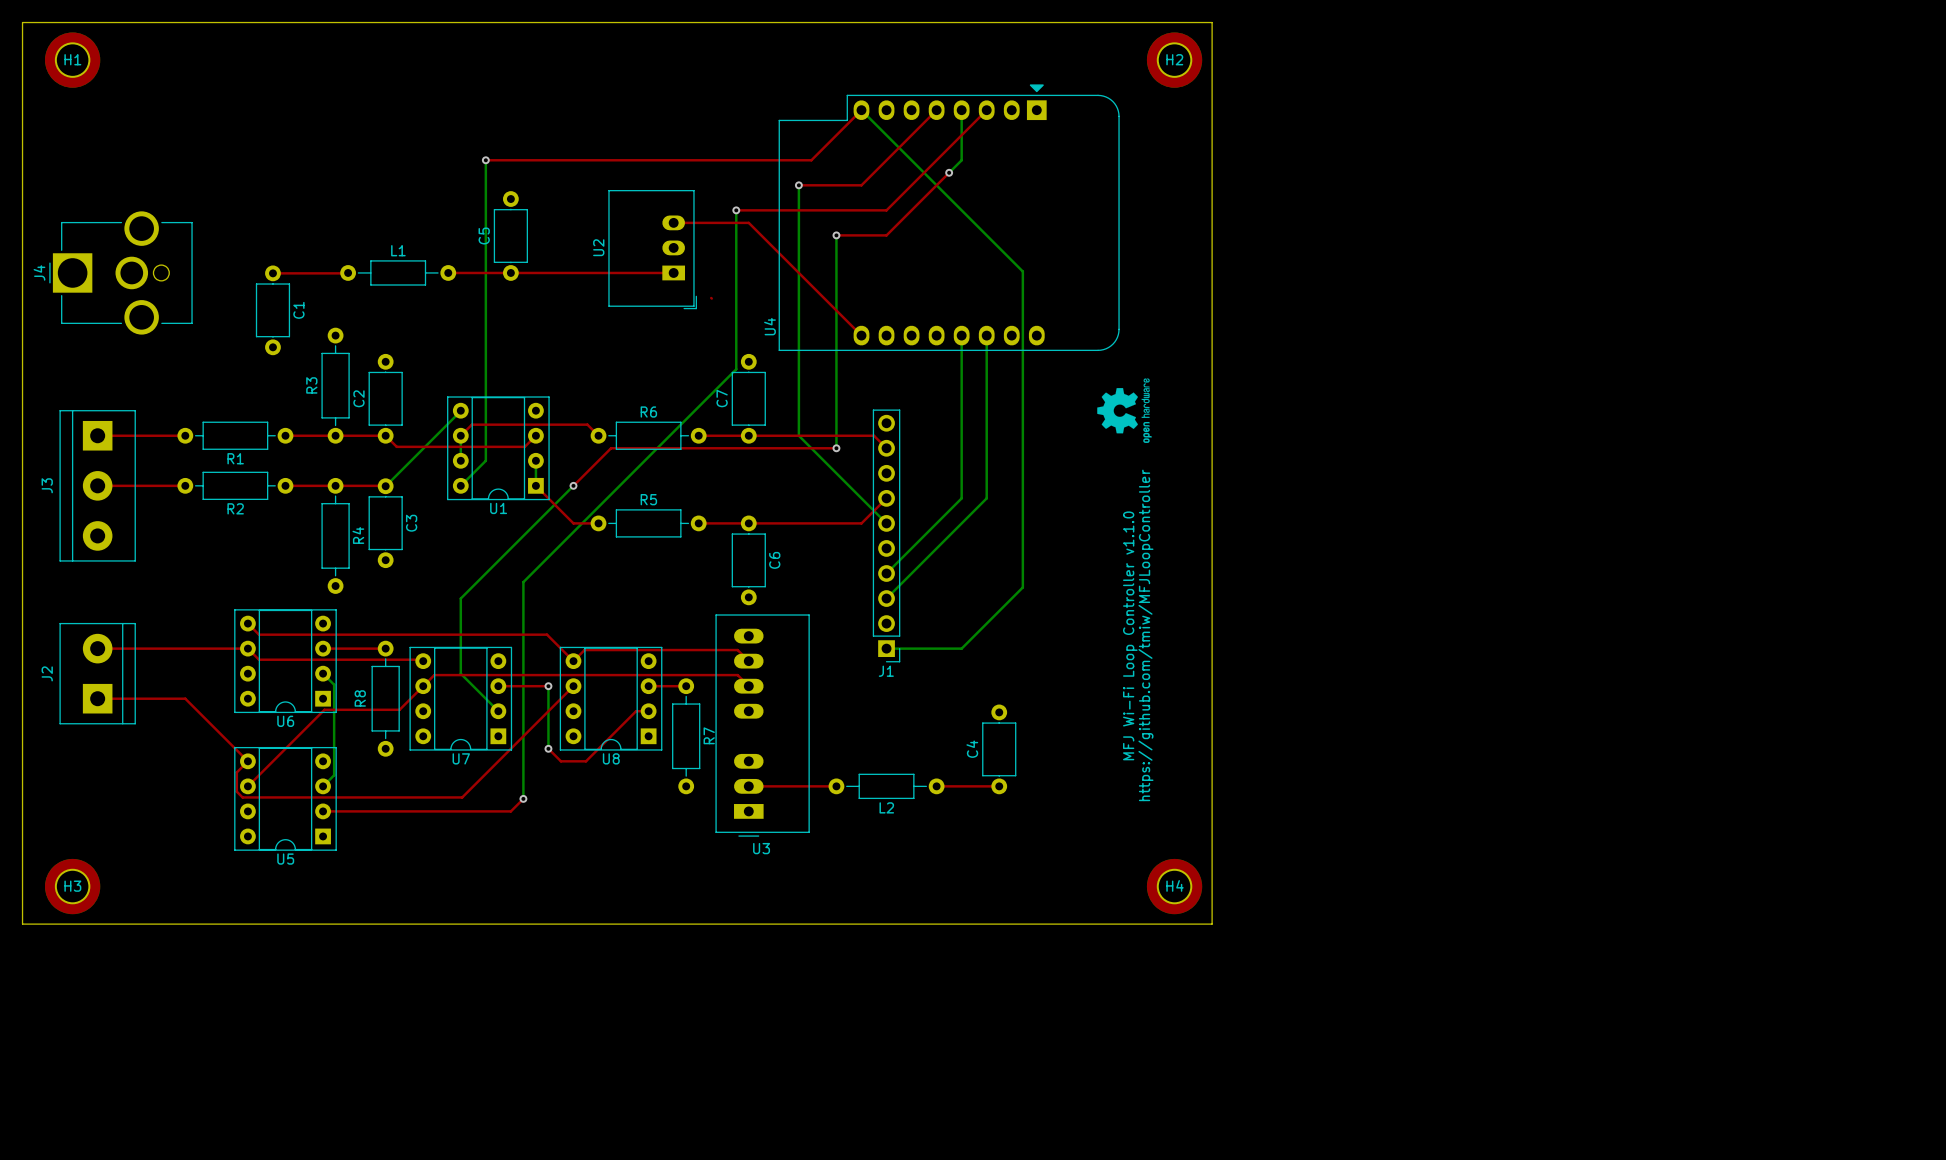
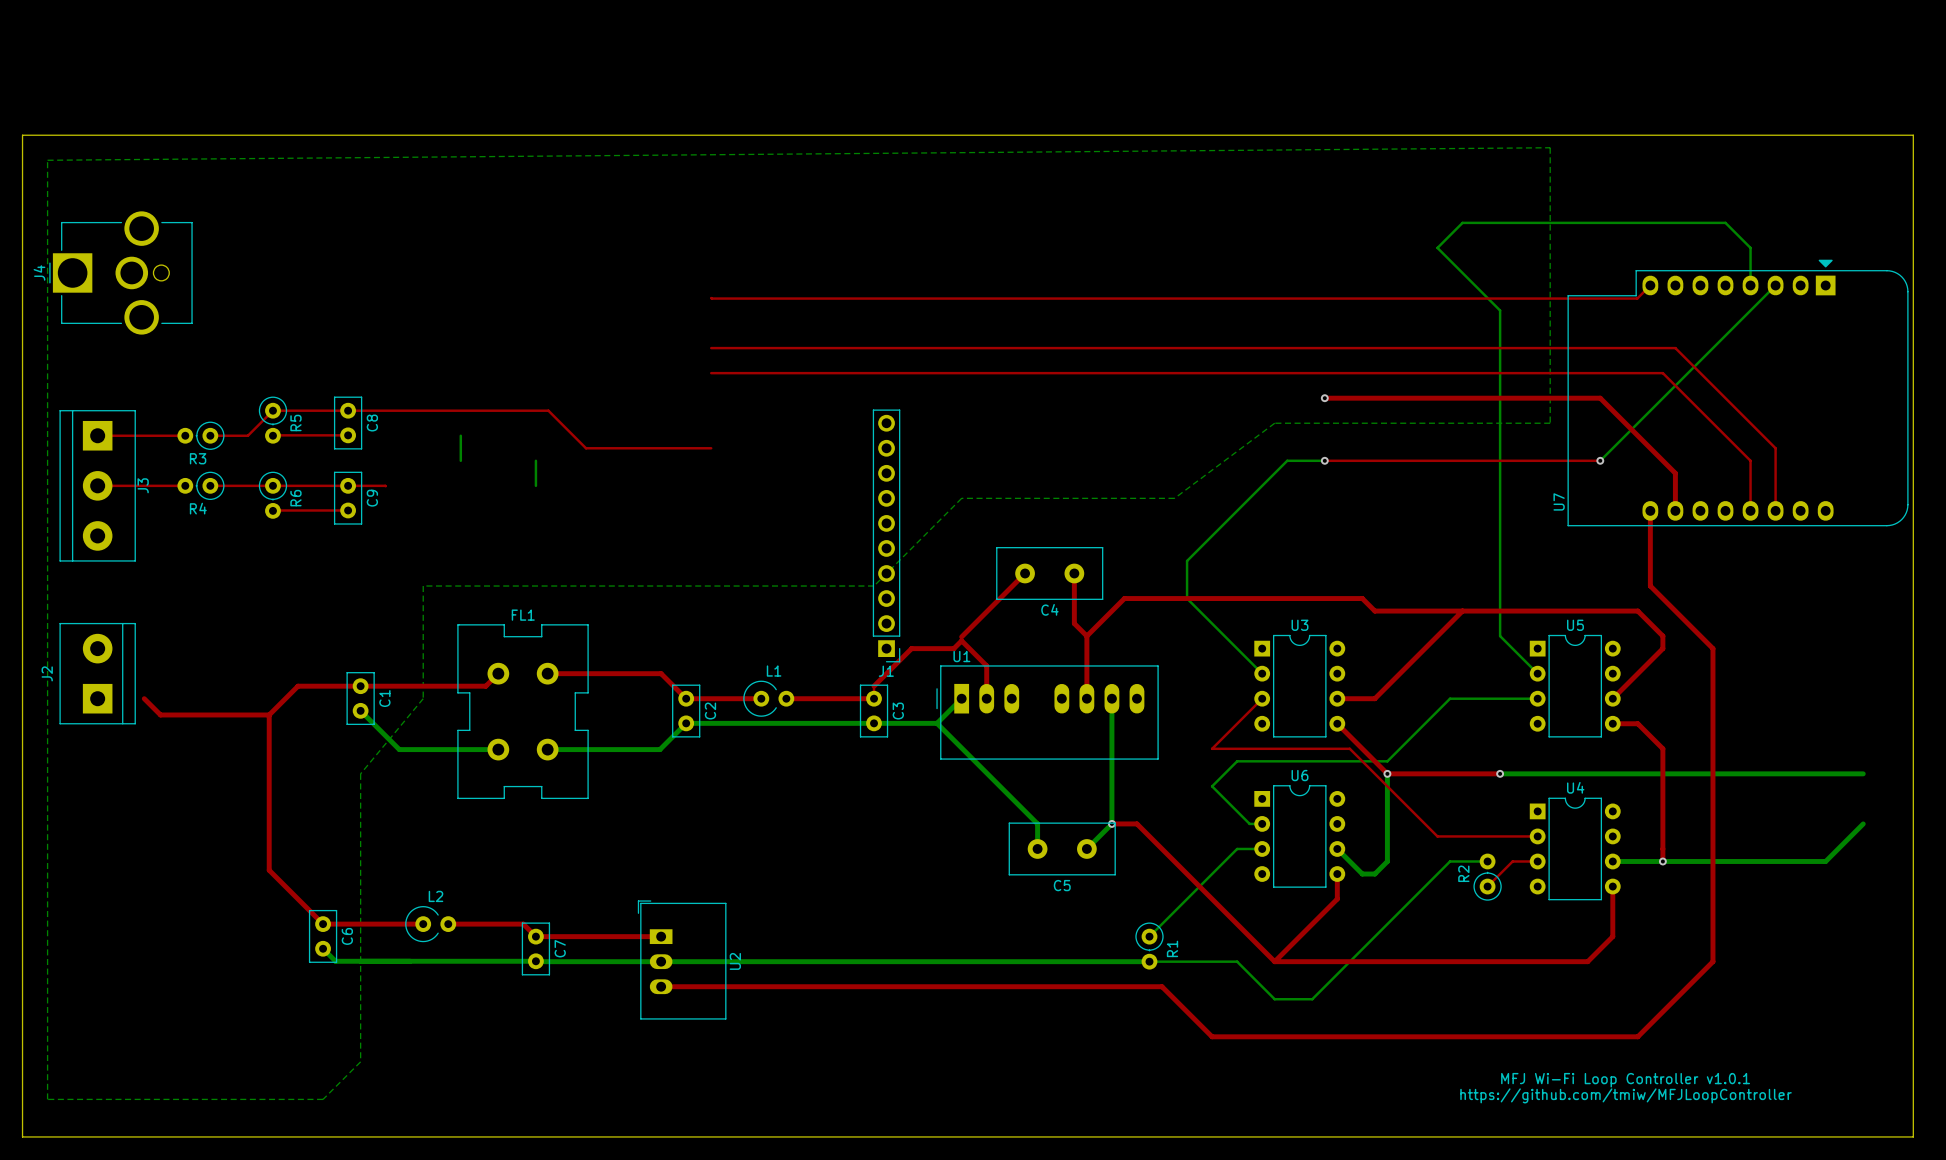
H1: (72, 60) -> none
H2: (1174, 60) -> none
U4 footprint: [778, 84, 1120, 351] -> [1529, 797, 1621, 901]
top track: (861, 110) (811, 160) (485, 160) -> none
bottom track: (861, 110) (1022, 271) (1022, 587) (961, 648) (886, 648) -> none
top track: (936, 110) (861, 185) (798, 185) -> none
bottom track: (961, 110) (961, 160) (949, 172) -> none
top track: (986, 110) (886, 210) (736, 210) -> none
board edge: (22, 135) (22, 22) (1212, 22) (1212, 924) (22, 924) -> (22, 135) (1913, 135) (1913, 1136) (22, 1136) (22, 924)
bottom zone outline: none -> (1550, 147) (47, 160) (47, 1099) (323, 1099) (360, 1061) (360, 773) (423, 698) (423, 586) (874, 586) (961, 498) (1174, 498) (1274, 423) (1550, 423) (1550, 147)
bottom track: (485, 160) (485, 460) (460, 485) -> none
via: (485, 160) -> none
top track: (949, 172) (886, 235) (836, 235) -> none
via: (949, 172) -> none
bottom track: (798, 185) (798, 435) (886, 523) -> none
via: (798, 185) -> none
C5 footprint: [493, 191, 528, 281] -> [1008, 822, 1116, 876]
bottom track: (736, 210) (736, 369) (523, 582) (523, 798) -> none
via: (736, 210) -> none
top track: (673, 222) (748, 222) (861, 335) -> none
C5 name position: C5 (484, 235) -> C5 (1062, 885)
bottom track: (836, 235) (836, 448) -> none
via: (836, 235) -> none
U2 rotation: 0° (652, 249) -> 180° (682, 959)
U2 position: (652, 249) -> (682, 959)
L1 footprint: [340, 260, 457, 286] -> [743, 680, 795, 717]
C1 footprint: [255, 265, 291, 356] -> [346, 672, 375, 725]
top track: (348, 272) (272, 273) -> none
top track: (448, 272) (673, 272) -> none
top track: none -> (1650, 285) (1637, 298) (711, 298)
bottom track: none -> (1750, 285) (1750, 247) (1725, 222) (1462, 222) (1437, 247) (1500, 310) (1500, 636) (1537, 673)
bottom track: none -> (1775, 285) (1600, 460)
U4 name position: U4 (769, 326) -> U4 (1575, 787)
R3 footprint: [321, 327, 350, 444] -> [177, 421, 225, 450]
bottom track: (961, 335) (961, 498) (886, 573) -> none
bottom track: (986, 335) (986, 498) (886, 598) -> none
top track: none -> (711, 348) (1675, 348) (1775, 448) (1775, 510)
C2 footprint: [368, 353, 403, 444] -> [672, 684, 701, 738]
C7 footprint: [731, 353, 766, 444] -> [521, 922, 551, 976]
top track: none -> (711, 373) (1662, 373) (1750, 460) (1750, 510)
drawing: [1097, 378, 1152, 443] -> none
R3 name position: R3 (311, 385) -> R3 (198, 458)
U1 footprint: [447, 396, 550, 501] -> [936, 665, 1159, 760]
C2 name position: C2 (358, 398) -> C2 (710, 711)
C7 name position: C7 (722, 398) -> C7 (560, 948)
top track: none -> (1324, 398) (1600, 398) (1675, 473) (1675, 510)
via: none -> (1324, 398)
bottom track: (460, 410) (385, 486) -> none
R6 name position: R6 (648, 412) -> R6 (295, 498)
R1 footprint: [177, 421, 294, 450] -> [1135, 922, 1164, 970]
R6 footprint: [590, 421, 707, 450] -> [258, 471, 288, 519]
C8: none -> (348, 423)
top track: (285, 435) (385, 435) (396, 446) (524, 446) (535, 435) -> none
top track: none -> (348, 435) (272, 435)
top track: (460, 435) (471, 424) (587, 424) (598, 435) -> none
top track: (698, 435) (874, 435) (886, 448) -> none
top track: (611, 448) (573, 485) -> (611, 448) (586, 448) (548, 410) (272, 410) (247, 435) (210, 435)
top track: (711, 448) (836, 448) -> none
via: (836, 448) -> none
R1 name position: R1 (235, 458) -> R1 (1172, 948)
top track: none -> (1324, 460) (1600, 460)
bottom track: none -> (1324, 460) (1287, 460) (1187, 560) (1187, 598) (1262, 673)
via: none -> (1324, 460)
via: none -> (1600, 460)
R2 footprint: [177, 471, 294, 500] -> [1473, 853, 1502, 901]
R4 footprint: [321, 477, 350, 594] -> [177, 471, 225, 500]
C3 footprint: [368, 478, 403, 569] -> [859, 684, 889, 738]
J3 name position: J3 (47, 485) -> J3 (143, 485)
top track: none -> (210, 485) (285, 485)
top track: (535, 485) (573, 523) (598, 523) -> none
bottom track: (573, 485) (460, 598) (460, 673) (498, 711) -> none
via: (573, 485) -> none
C9: none -> (348, 498)
top track: (886, 498) (861, 523) (698, 523) -> none
R5 name position: R5 (648, 499) -> R5 (295, 423)
R2 name position: R2 (235, 508) -> R2 (1463, 873)
U1 name position: U1 (498, 508) -> U1 (961, 656)
R5 footprint: [590, 509, 707, 538] -> [258, 396, 288, 444]
top track: none -> (348, 510) (272, 510)
top track: none -> (1650, 510) (1650, 586) (1712, 648) (1712, 961) (1637, 1036) (1212, 1036) (1162, 986) (661, 986)
C6 footprint: [731, 515, 766, 606] -> [308, 910, 338, 963]
R4 name position: R4 (358, 535) -> R4 (198, 508)
top track: none -> (1025, 573) (961, 636) (961, 640)
top track: none -> (1074, 573) (1074, 623) (1086, 636)
U6 footprint: [234, 609, 337, 714] -> [1254, 785, 1346, 888]
top track: none -> (1462, 611) (1374, 698) (1337, 698)
U3 footprint: [715, 614, 810, 837] -> [1254, 634, 1346, 738]
top track: (247, 623) (259, 634) (547, 634) (573, 661) (584, 650) (737, 650) (748, 661) -> none
text: MFJ Wi-Fi Loop Controller v1.1.0 (1130, 635) -> none
text: https://github.com/tmiw/MFJLoopController (1145, 635) -> none
top track: none -> (1086, 636) (1086, 698)
top track: none -> (1086, 636) (1124, 598) (1362, 598) (1374, 611) (1637, 611) (1662, 636) (1662, 648) (1612, 698)
top track: none -> (961, 640) (953, 648) (911, 648) (874, 686) (874, 698) (786, 698)
top track: none -> (961, 640) (986, 665) (986, 698)
U7 footprint: [409, 646, 513, 751] -> [1567, 259, 1909, 527]
top track: (97, 648) (247, 648) (259, 659) (423, 661) -> none
top track: (323, 648) (385, 648) -> none
bottom track: (323, 673) (334, 684) (334, 775) (323, 786) -> none
top track: none -> (498, 673) (485, 686) (298, 686) (269, 714)
top track: none -> (547, 673) (661, 673) (686, 698) (761, 698)
top track: (498, 686) (548, 686) -> none
bottom track: (548, 686) (548, 748) -> none
via: (548, 686) -> none
top track: (573, 686) (462, 797) (242, 797) (236, 791) (236, 772) (247, 761) (185, 698) (97, 698) -> none
top track: (648, 686) (686, 686) -> none
top track: (748, 686) (737, 675) (434, 675) (399, 709) (324, 709) (247, 786) -> none
top track: none -> (144, 698) (160, 714) (269, 714)
R8: (385, 698) -> none
U8: (611, 698) -> none
bottom track: none -> (961, 698) (937, 723)
bottom track: none -> (1111, 698) (1111, 823) (1086, 848)
top track: none -> (1262, 698) (1212, 748) (1349, 748) (1437, 836) (1537, 836)
bottom track: none -> (1537, 698) (1450, 698) (1387, 761) (1237, 761) (1212, 786) (1249, 823) (1262, 823)
C4 footprint: [982, 704, 1017, 795] -> [996, 547, 1104, 600]
bottom track: none -> (360, 710) (399, 749) (498, 749)
FL1: none -> (523, 711)
top track: (648, 711) (636, 711) (586, 761) (560, 761) (548, 748) -> none
top track: none -> (269, 714) (269, 870) (323, 924) (423, 924)
U6 name position: U6 (285, 721) -> U6 (1299, 775)
bottom track: none -> (937, 723) (686, 723) (659, 749) (547, 749)
bottom track: none -> (937, 723) (1037, 823) (1037, 848)
top track: none -> (1337, 723) (1387, 773) (1500, 773)
top track: none -> (1612, 723) (1637, 723) (1662, 748) (1662, 861)
R7: (686, 736) -> none
U5 footprint: [234, 747, 337, 851] -> [1529, 634, 1621, 738]
via: (548, 748) -> none
C4 name position: C4 (972, 749) -> C4 (1049, 609)
U7 name position: U7 (461, 758) -> U7 (1559, 501)
L2 footprint: [828, 773, 945, 799] -> [405, 906, 457, 943]
bottom track: none -> (1387, 773) (1387, 861) (1374, 874) (1362, 874) (1337, 848)
via: none -> (1387, 773)
bottom track: none -> (1500, 773) (1863, 773)
via: none -> (1500, 773)
top track: (748, 786) (836, 786) -> none
top track: (936, 786) (999, 786) -> none
top track: (523, 798) (510, 811) (323, 811) -> none
via: (523, 798) -> none
L2 name position: L2 (886, 807) -> L2 (435, 896)
top track: none -> (1111, 823) (1136, 823) (1274, 961)
via: none -> (1111, 823)
bottom track: none -> (1863, 823) (1825, 861) (1612, 861)
U3 name position: U3 (761, 848) -> U3 (1299, 625)
bottom track: none -> (1262, 848) (1237, 848) (1149, 936)
U5 name position: U5 (285, 859) -> U5 (1575, 625)
bottom track: none -> (1487, 861) (1450, 861) (1312, 999) (1274, 999) (1237, 961) (335, 961) (323, 948)
top track: none -> (1537, 861) (1512, 861) (1487, 886)
via: none -> (1662, 861)
top track: none -> (1337, 874) (1337, 899) (1274, 961)
H3: (72, 886) -> none
H4: (1174, 886) -> none
top track: none -> (1612, 886) (1612, 936) (1587, 961) (1274, 961)
top track: none -> (448, 924) (523, 924) (535, 936) (661, 936)
text: none -> MFJ Wi-Fi Loop Controller v1.0.1 (1625, 1080)
text: none -> https://github.com/tmiw/MFJLoopController (1626, 1095)

